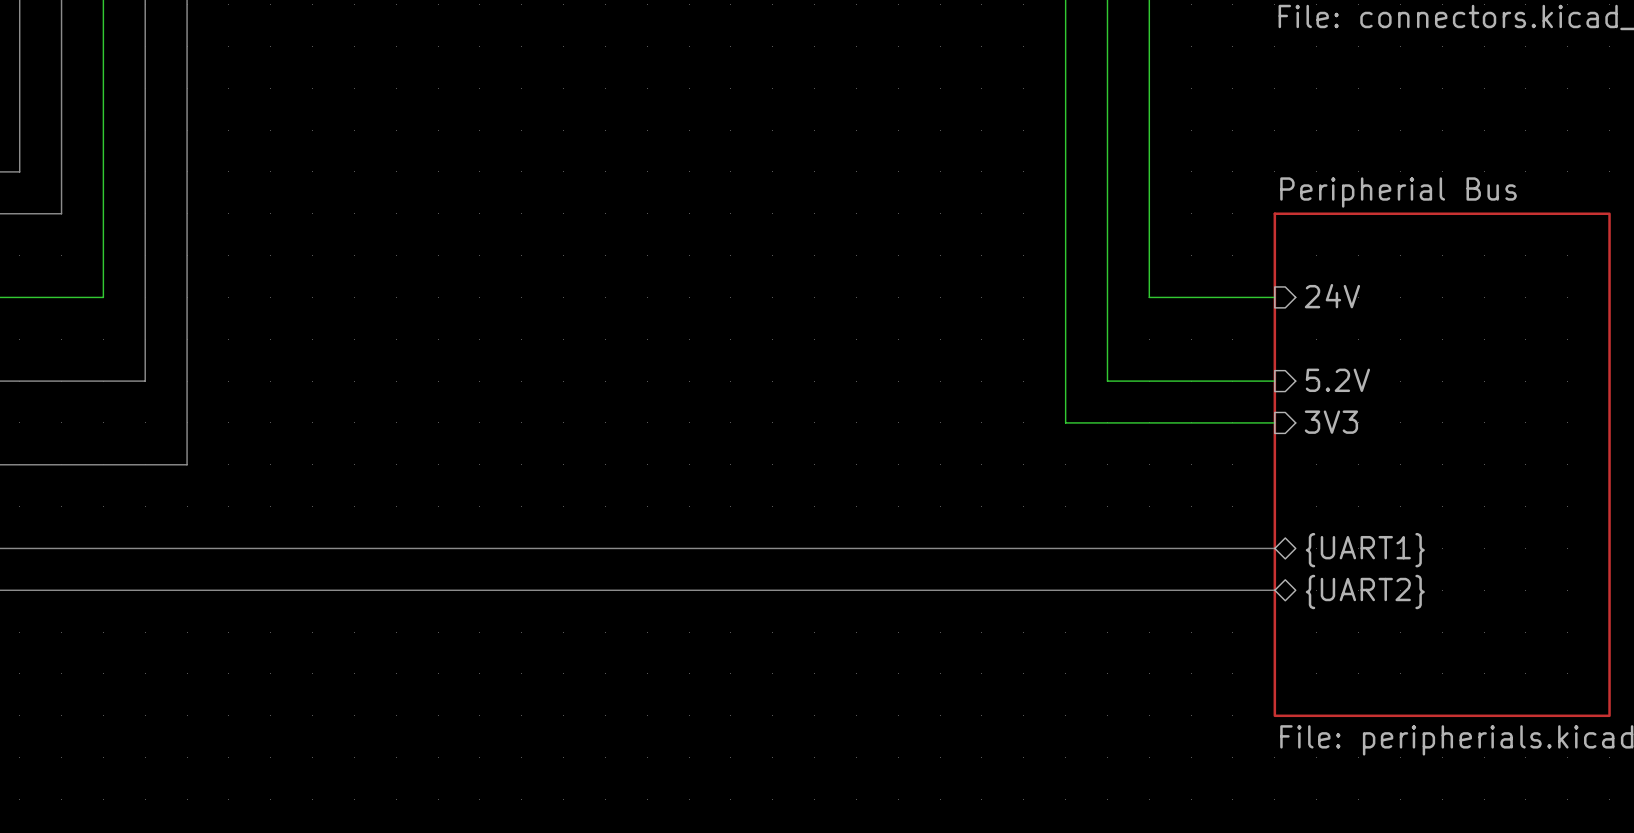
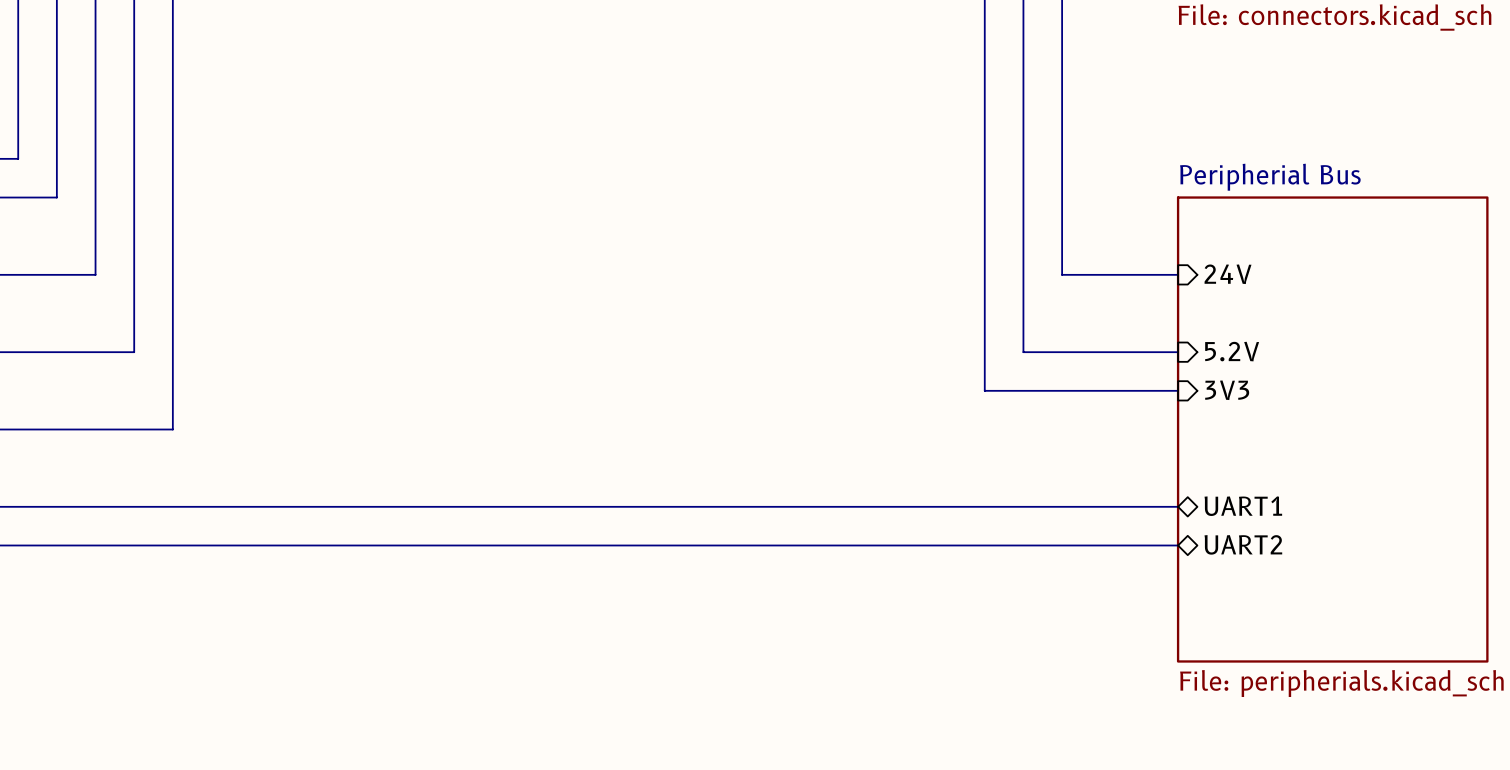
sheet pin: {UART1} (1365, 550) -> UART1 (1243, 506)
sheet pin: {UART2} (1365, 591) -> UART2 (1243, 544)

